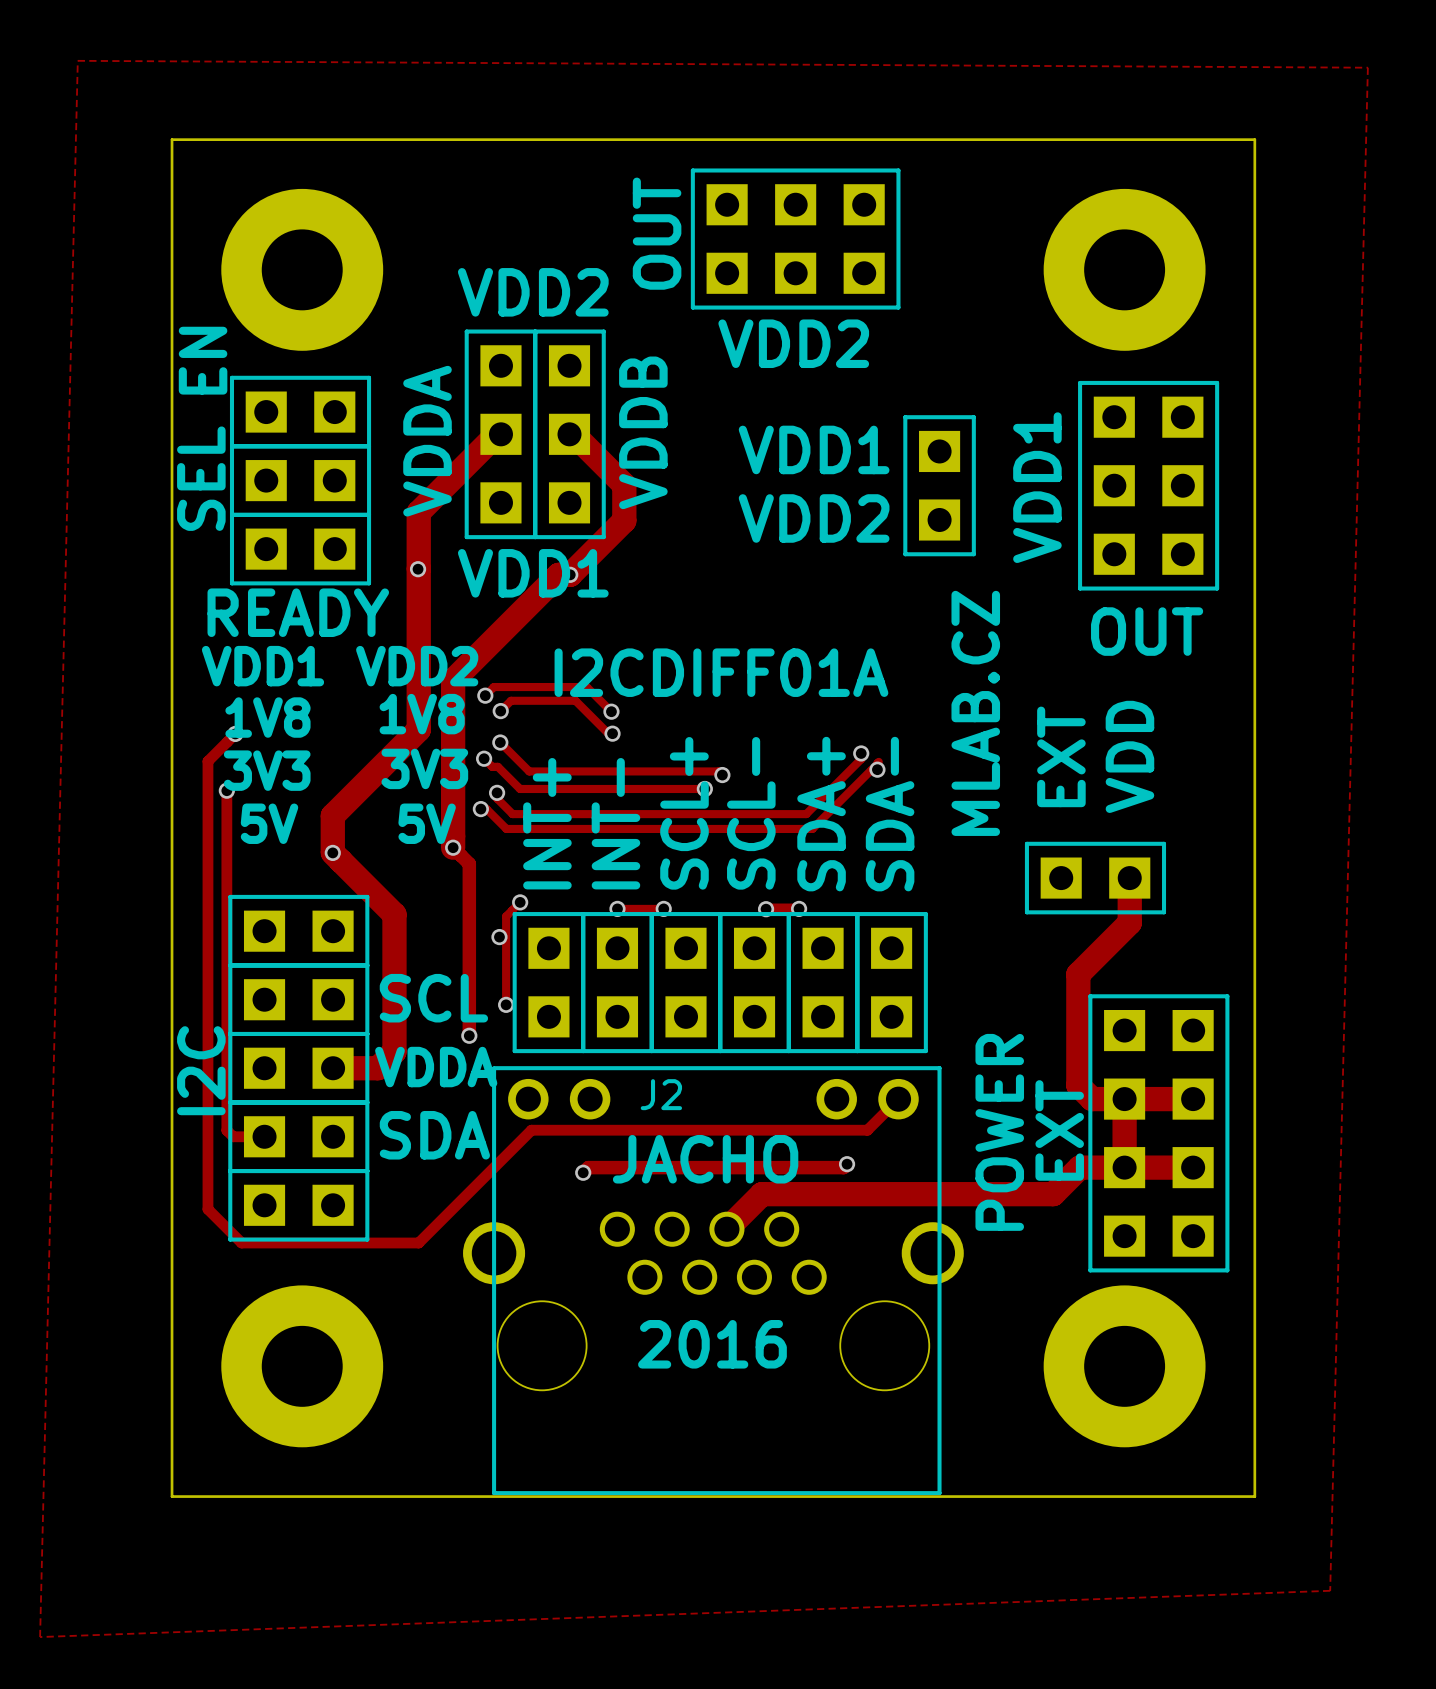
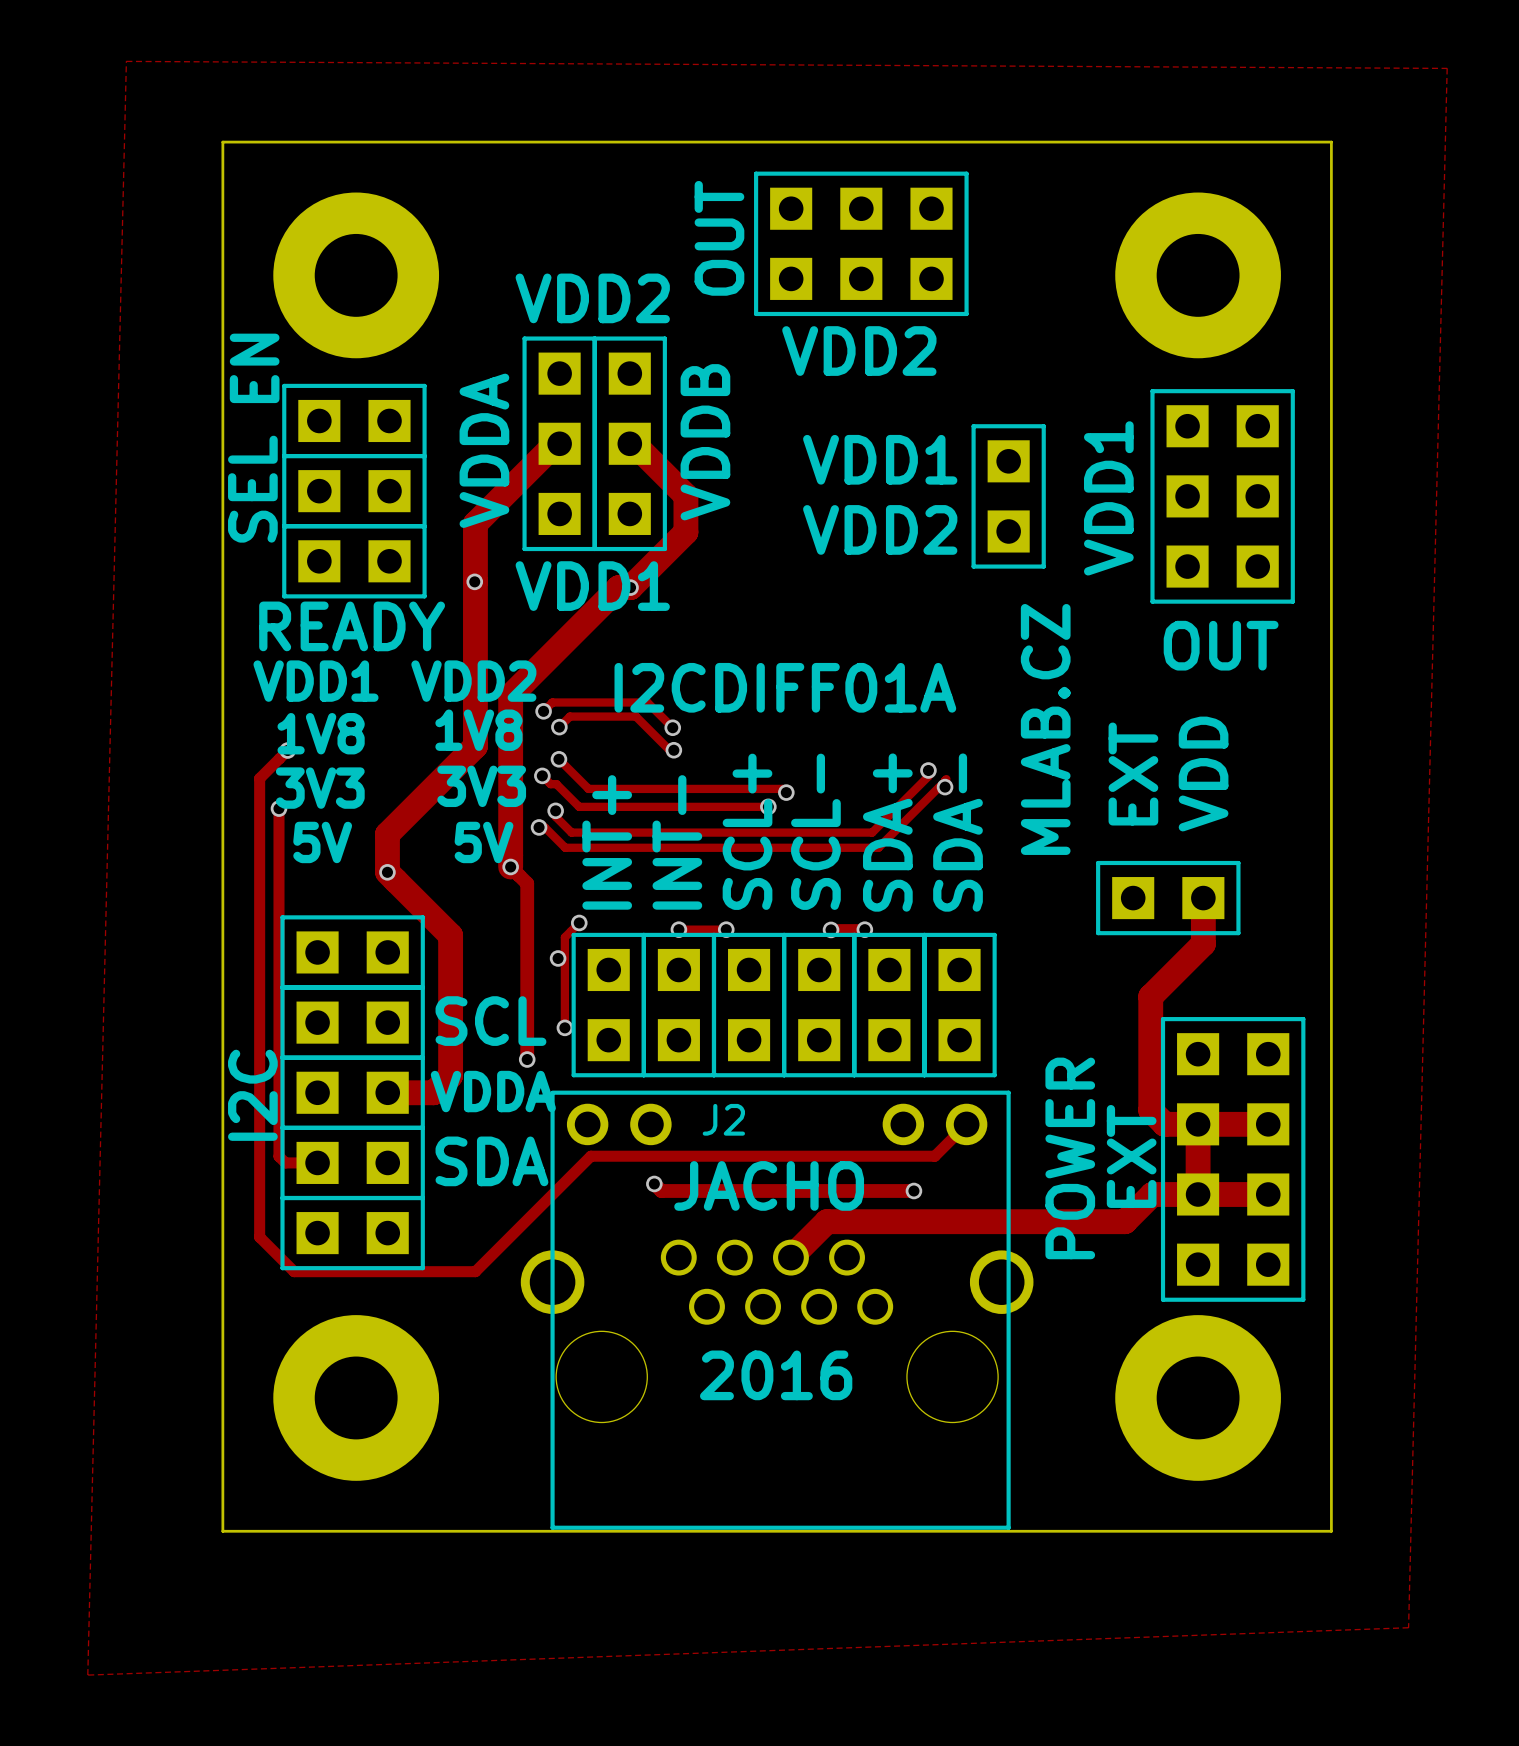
track: (847, 1164) (843, 1167) (588, 1167) (583, 1172) -> (913, 1190) (661, 1190) (654, 1183)
via position: (583, 1172) -> (654, 1183)

